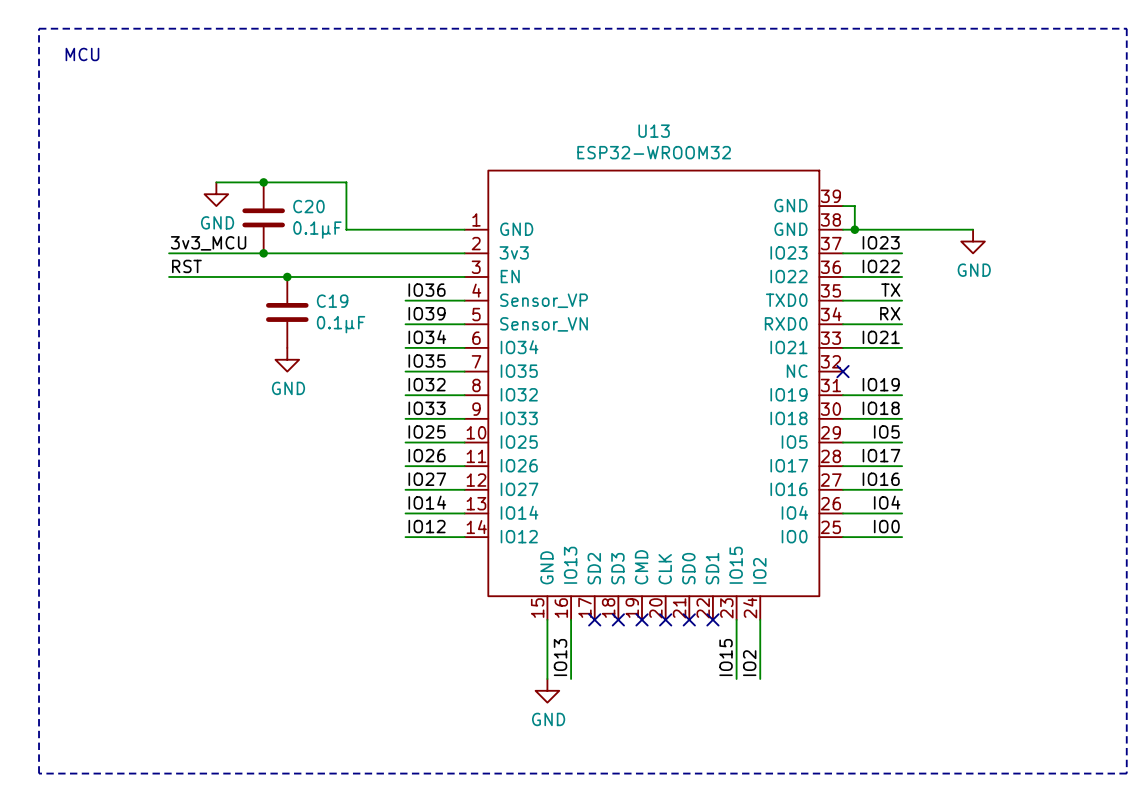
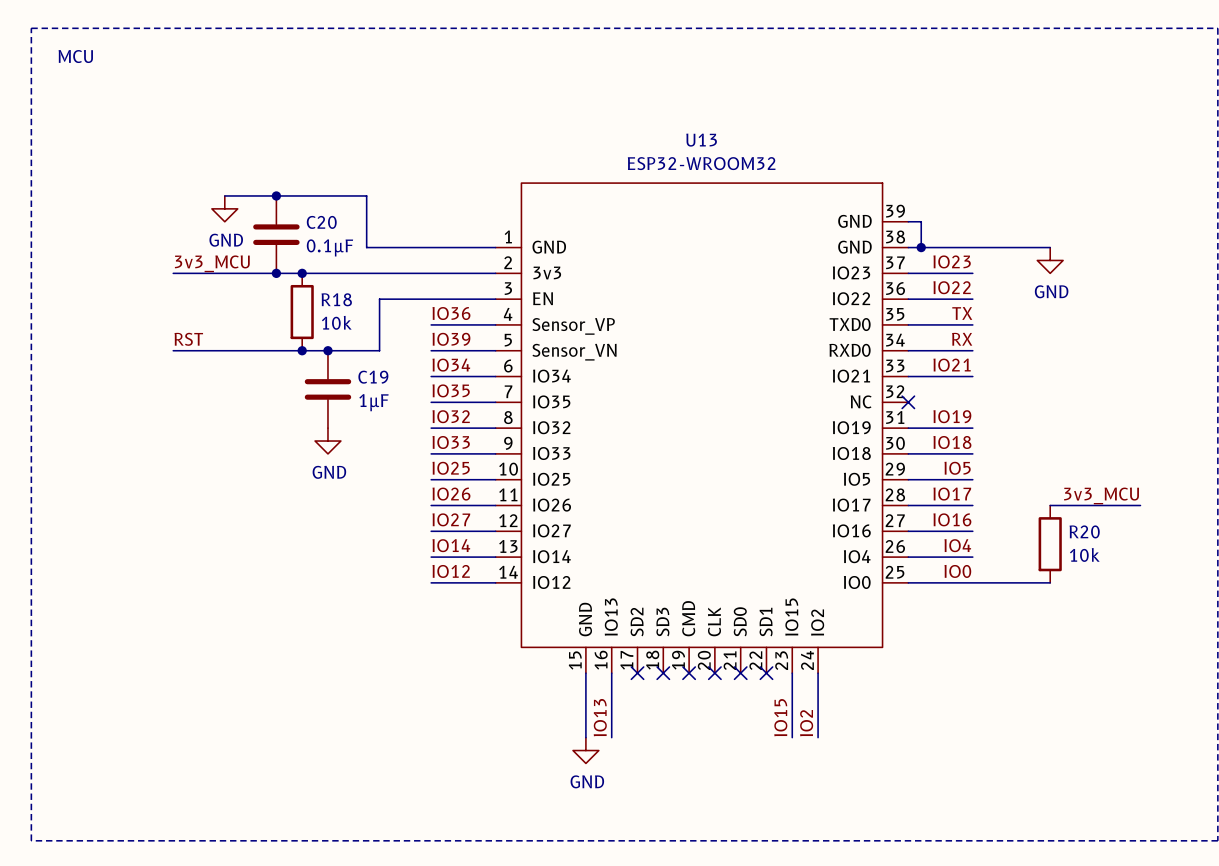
junction: none -> (302, 273)
label position: RST (186, 266) -> RST (188, 339)
wire: (169, 276) (358, 276) -> (173, 350) (379, 350) (379, 299)
junction: (287, 276) -> none
R18: none -> 10k (302, 312)
C19 position: (287, 312) -> (327, 389)
junction: none -> (302, 350)
junction: none -> (327, 350)
C19 value: 0.1µF (341, 324) -> 1µF (373, 402)
power symbol position: GND (287, 359) -> GND (327, 441)
label: none -> 3v3_MCU (1101, 495)
wire: none -> (1050, 505) (1140, 505)
R20: none -> 10k (1050, 544)
wire: none -> (972, 582) (1050, 582)

